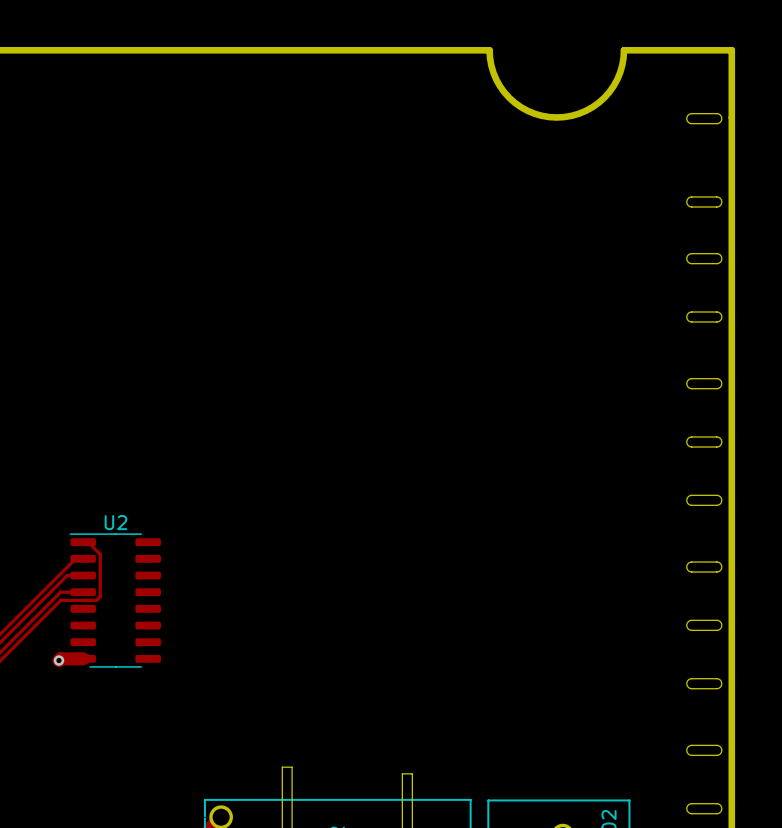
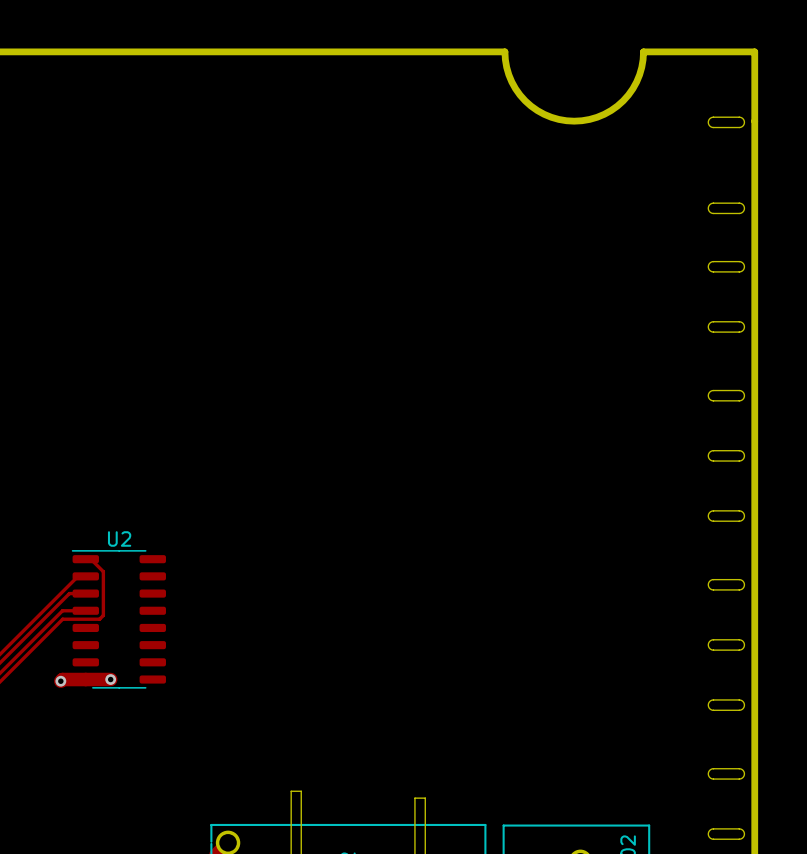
top track: none -> (85, 679) (110, 679)
via: none -> (110, 679)

